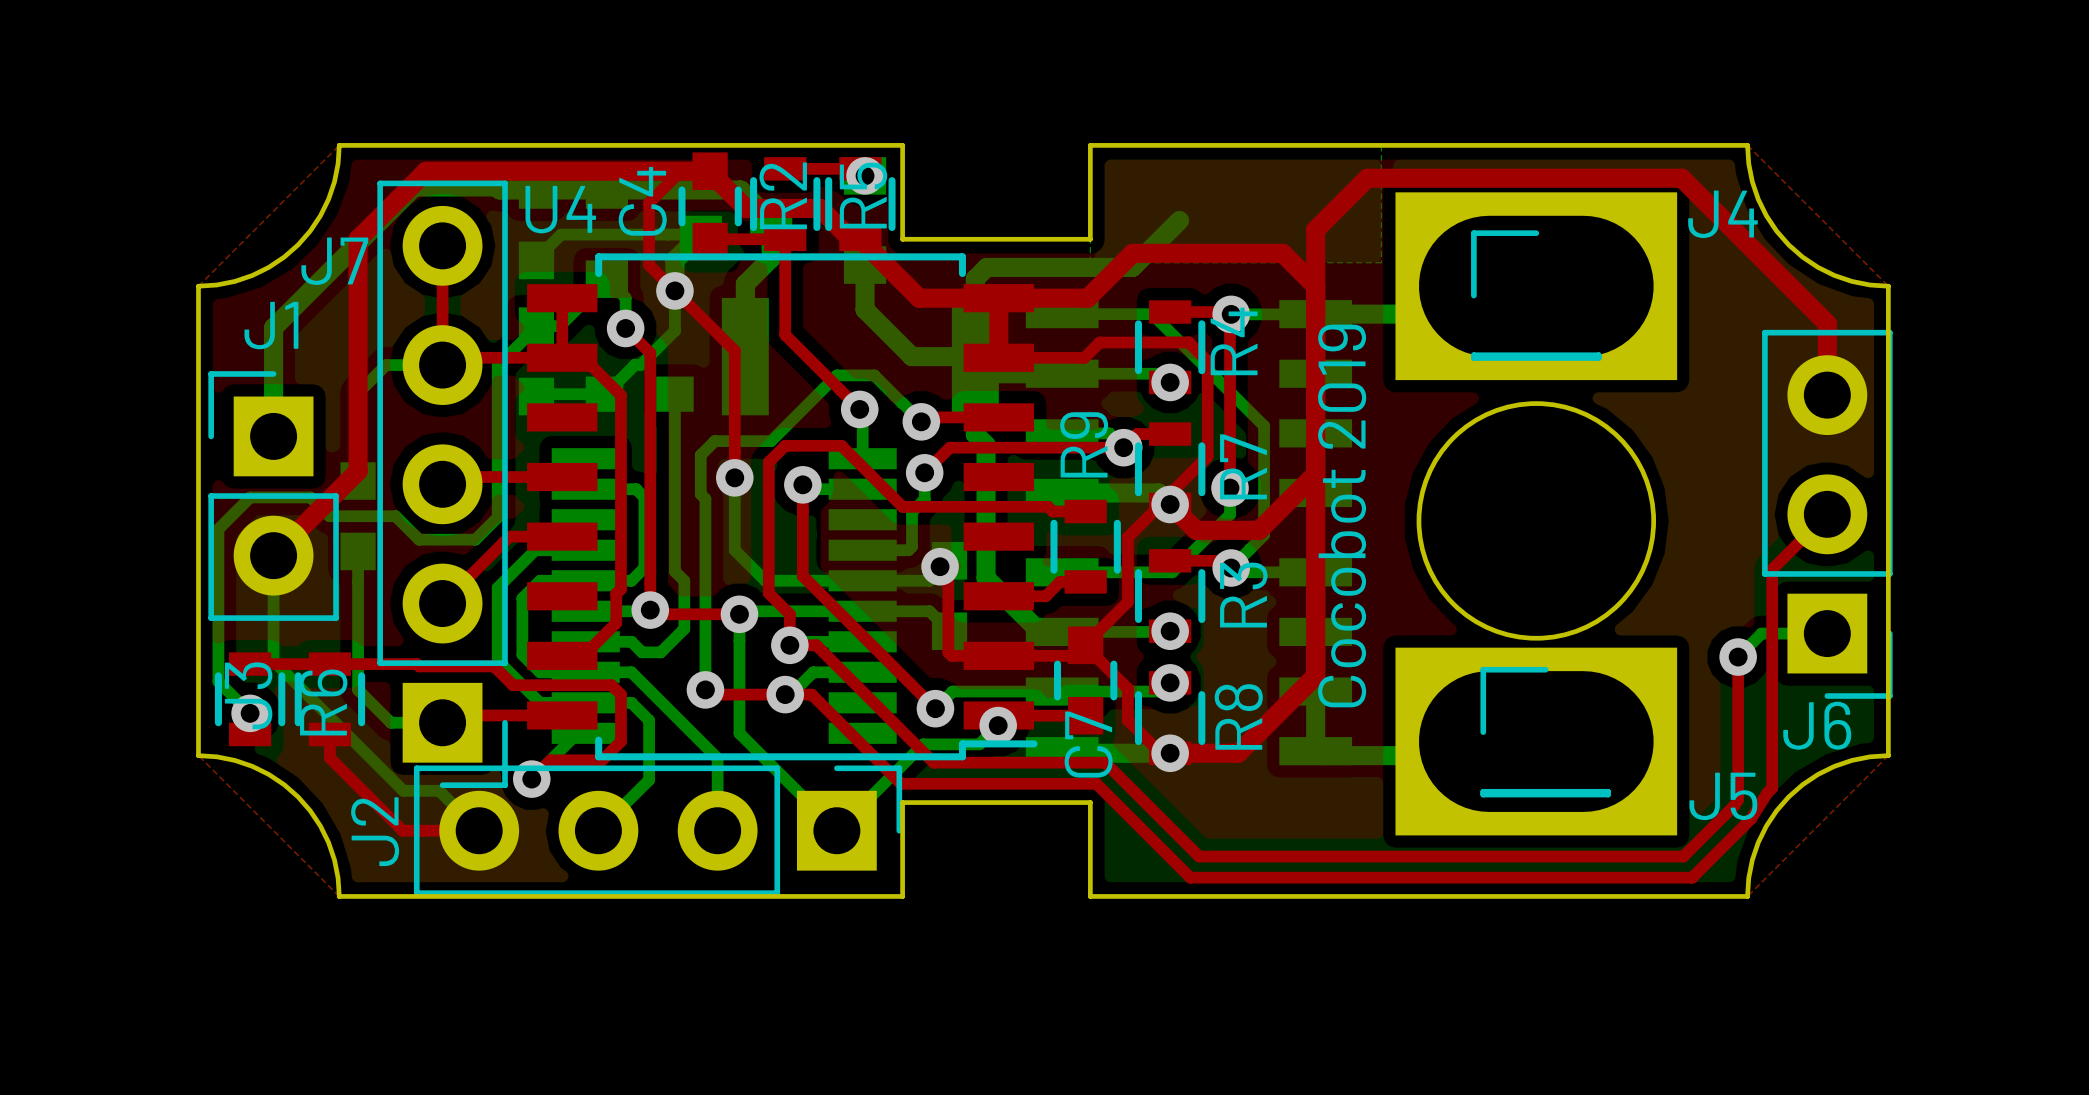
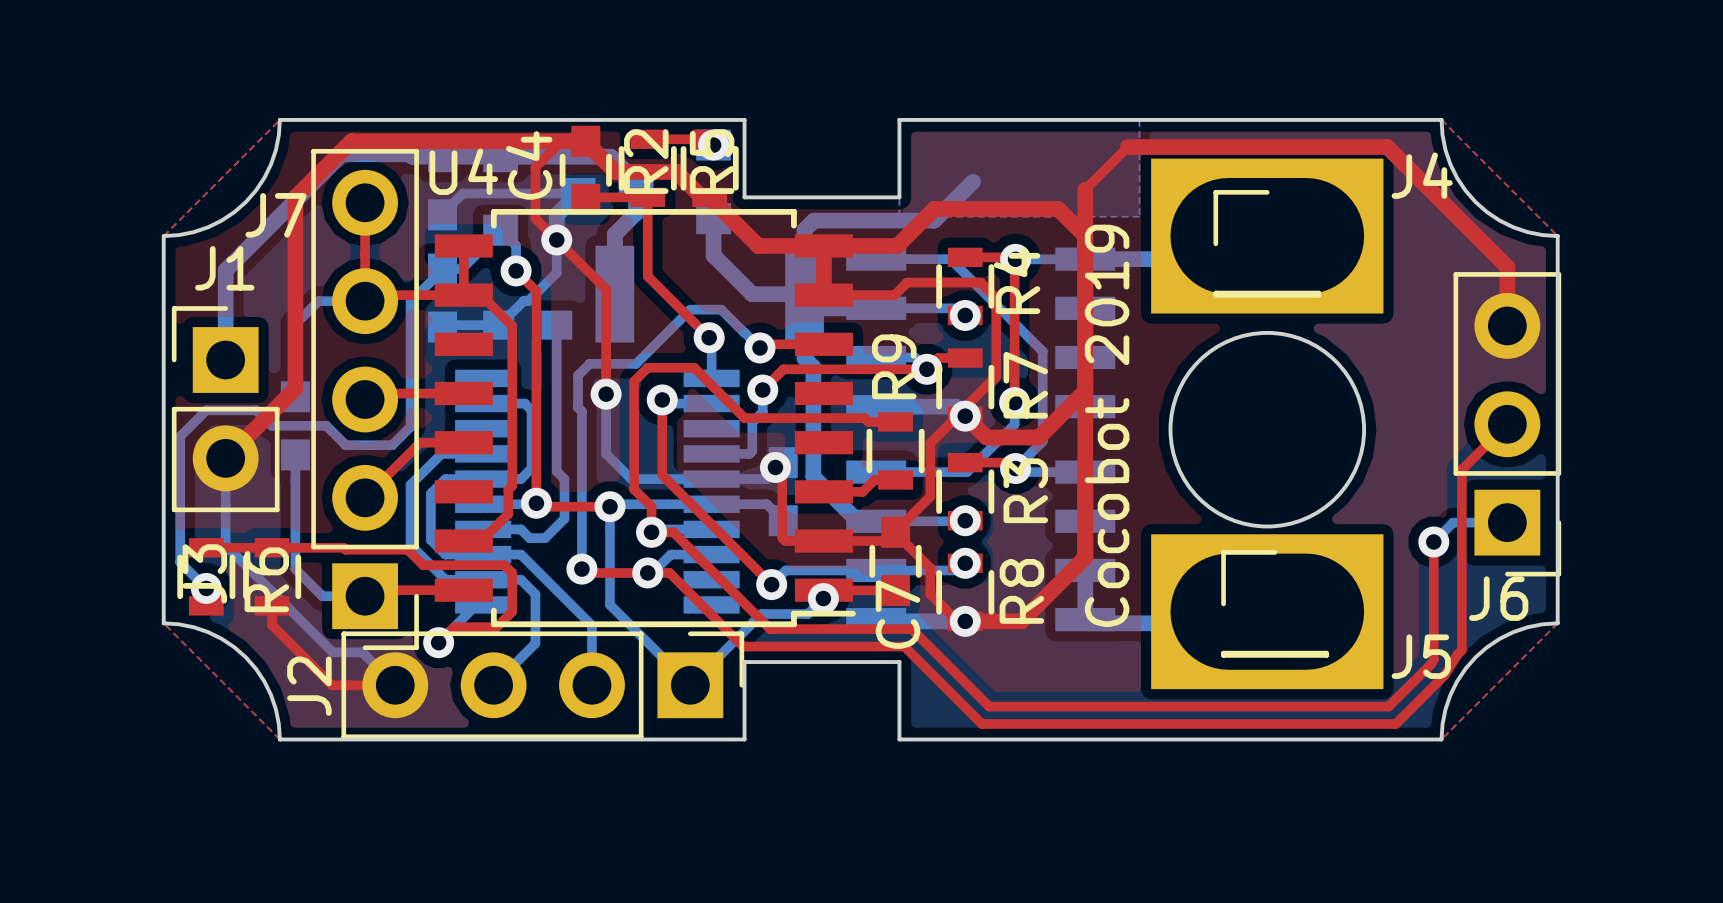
top track width: thick (1367, 178) (1315, 229) -> thin (1127, 147) (1085, 189)

